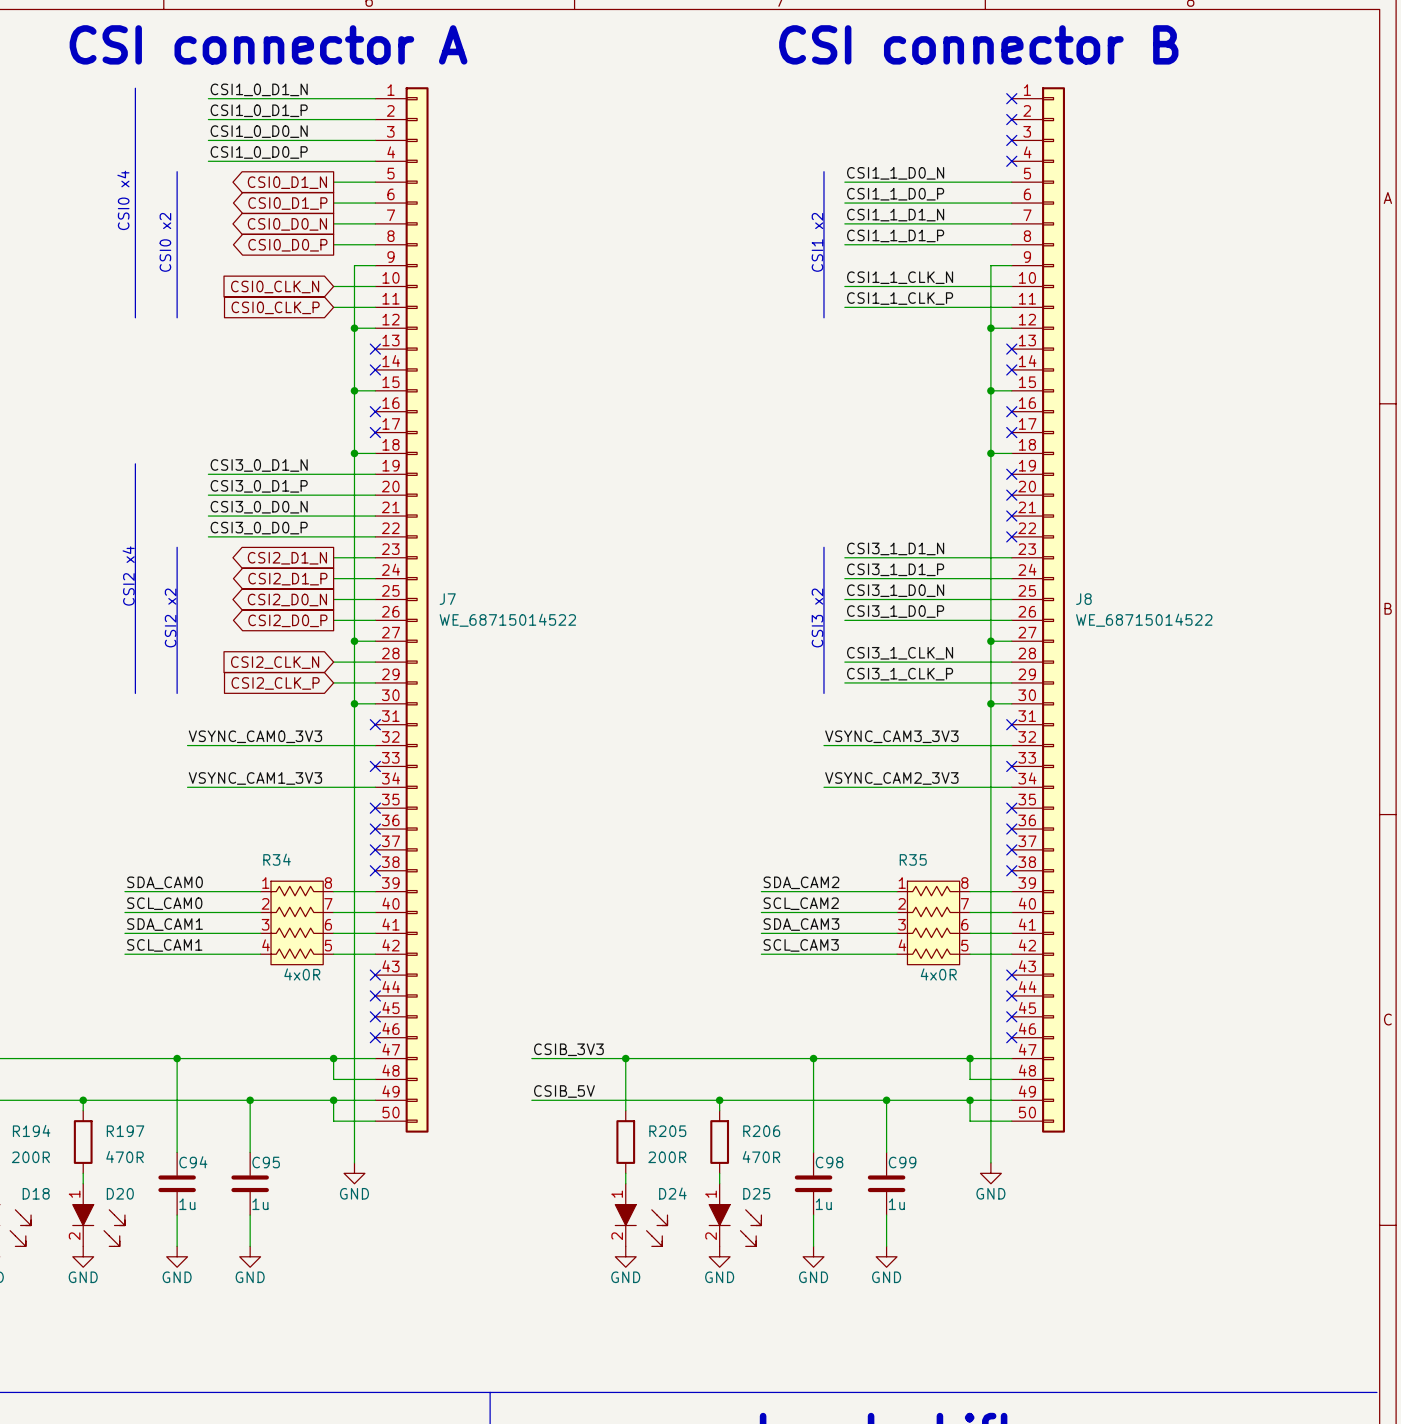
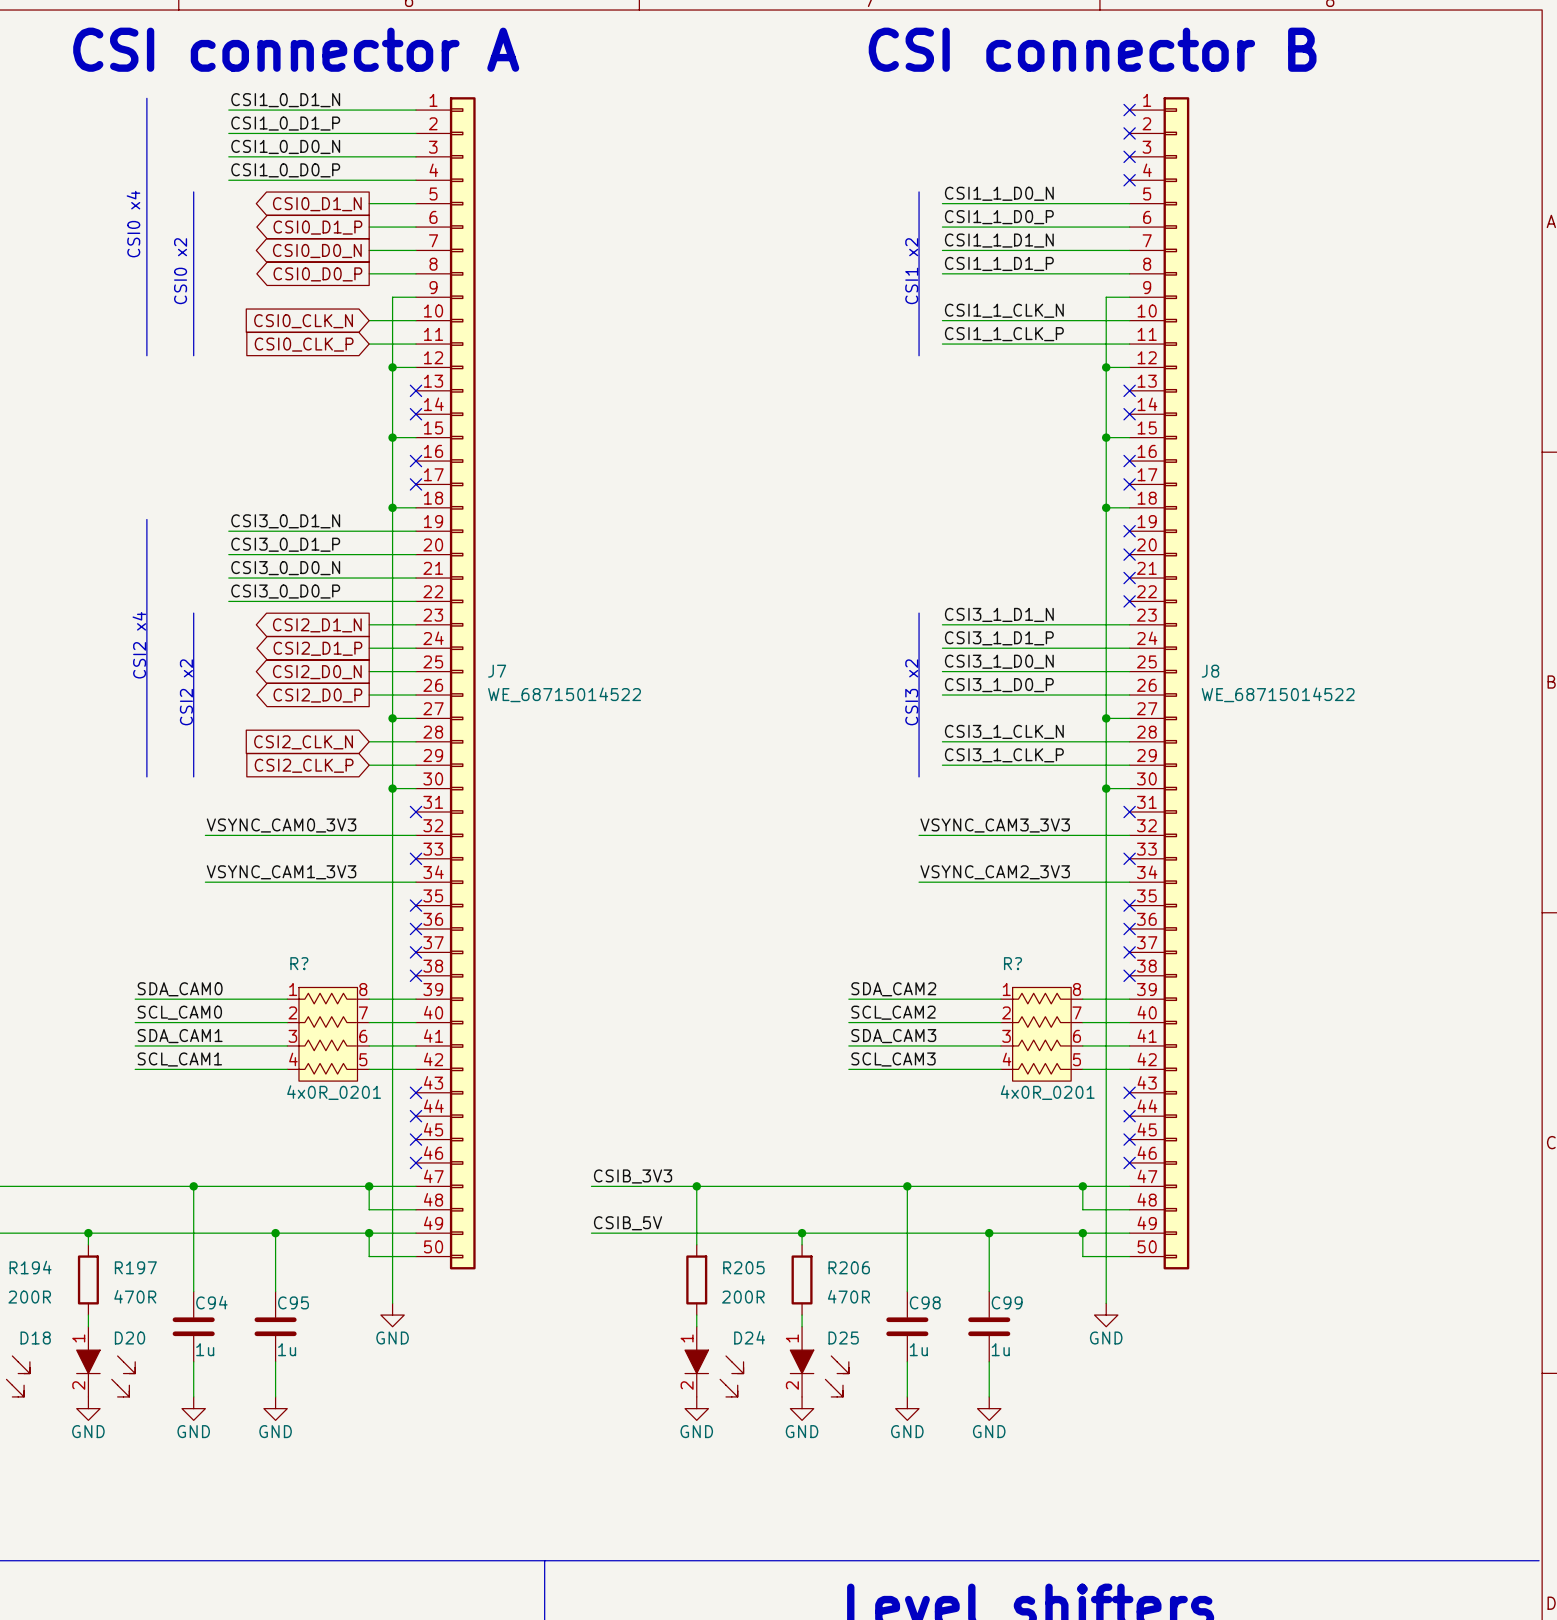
R34 name: R34 (277, 859) -> R? (299, 963)
R35 name: R35 (913, 859) -> R? (1012, 963)
R34 text: 4x0R (302, 974) -> 4x0R_0201 (334, 1092)
R35 text: 4x0R (938, 974) -> 4x0R_0201 (1047, 1092)

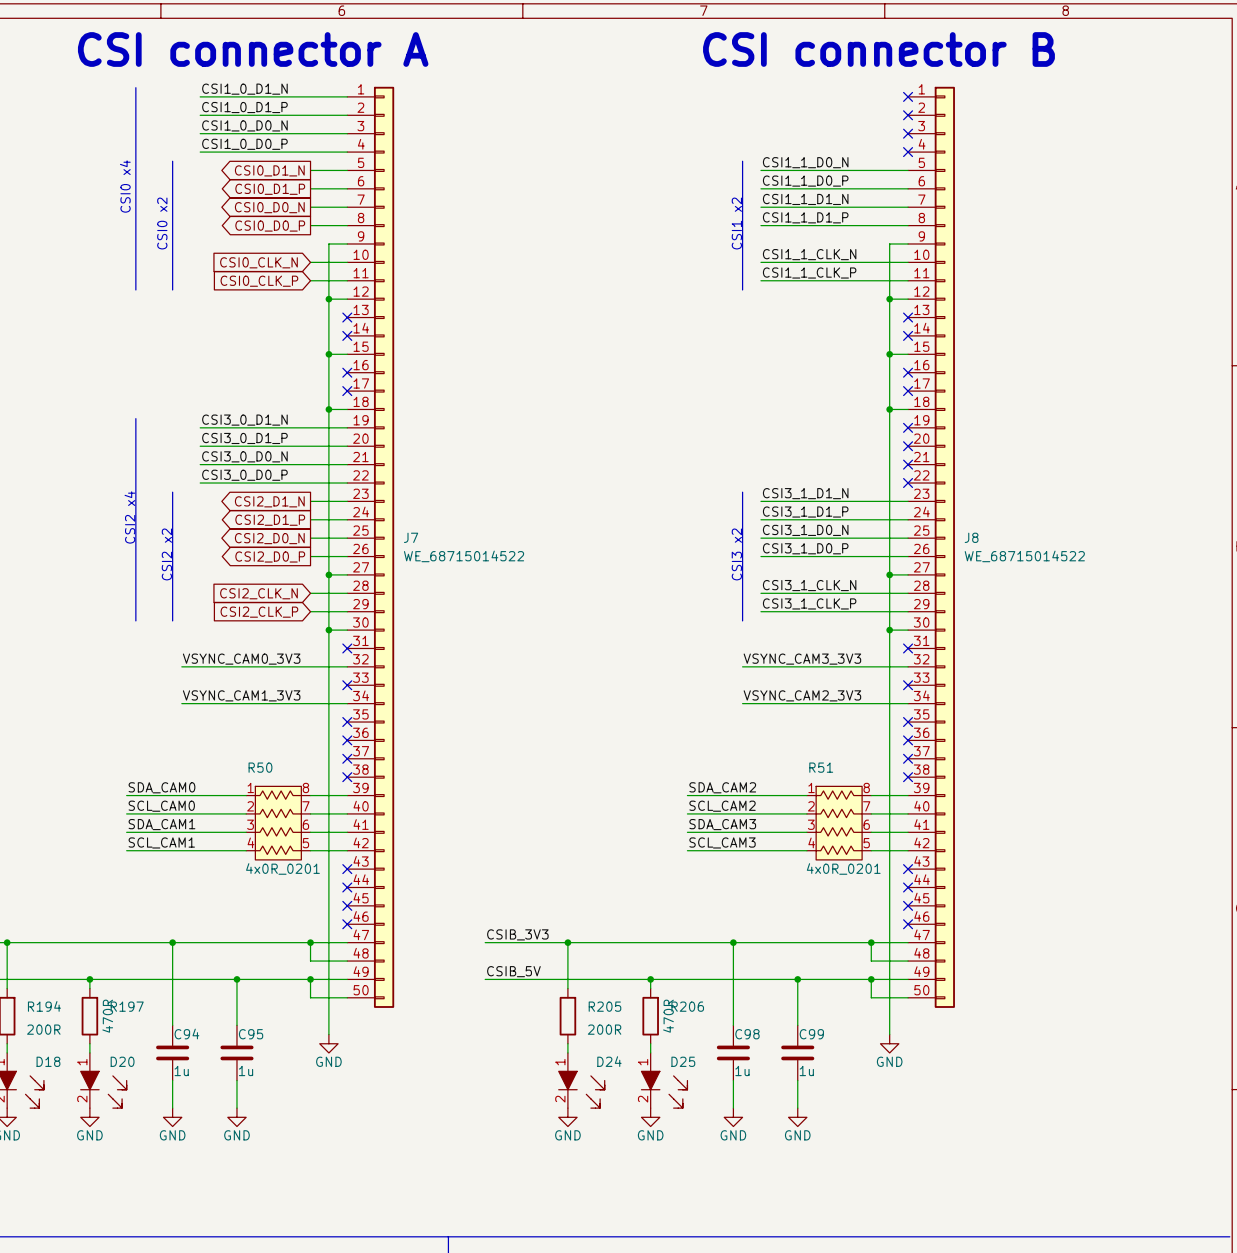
R? name: R? (299, 963) -> R50 (260, 767)
R? name: R? (1012, 963) -> R51 (821, 767)
R197 text rotation: 0° (135, 1296) -> 90° counterclockwise (107, 1016)
R206 text rotation: 0° (848, 1296) -> 90° counterclockwise (668, 1016)

